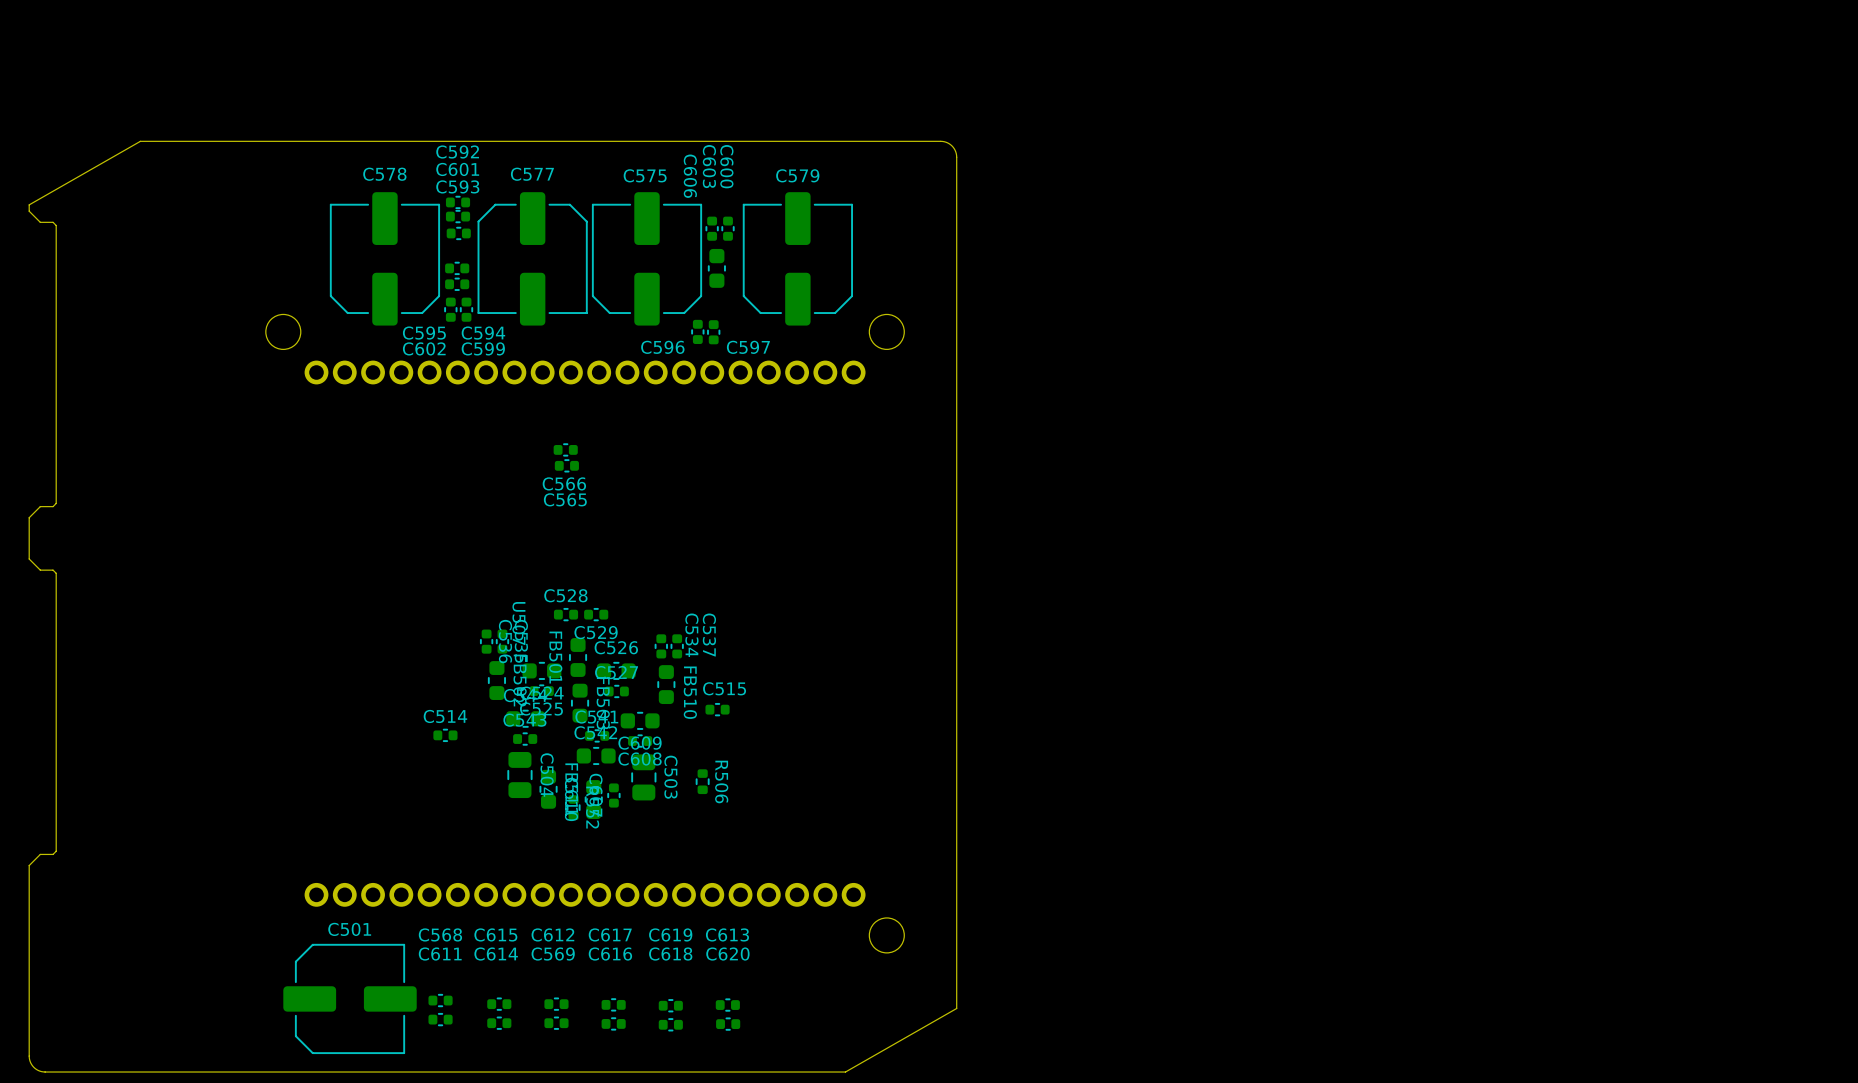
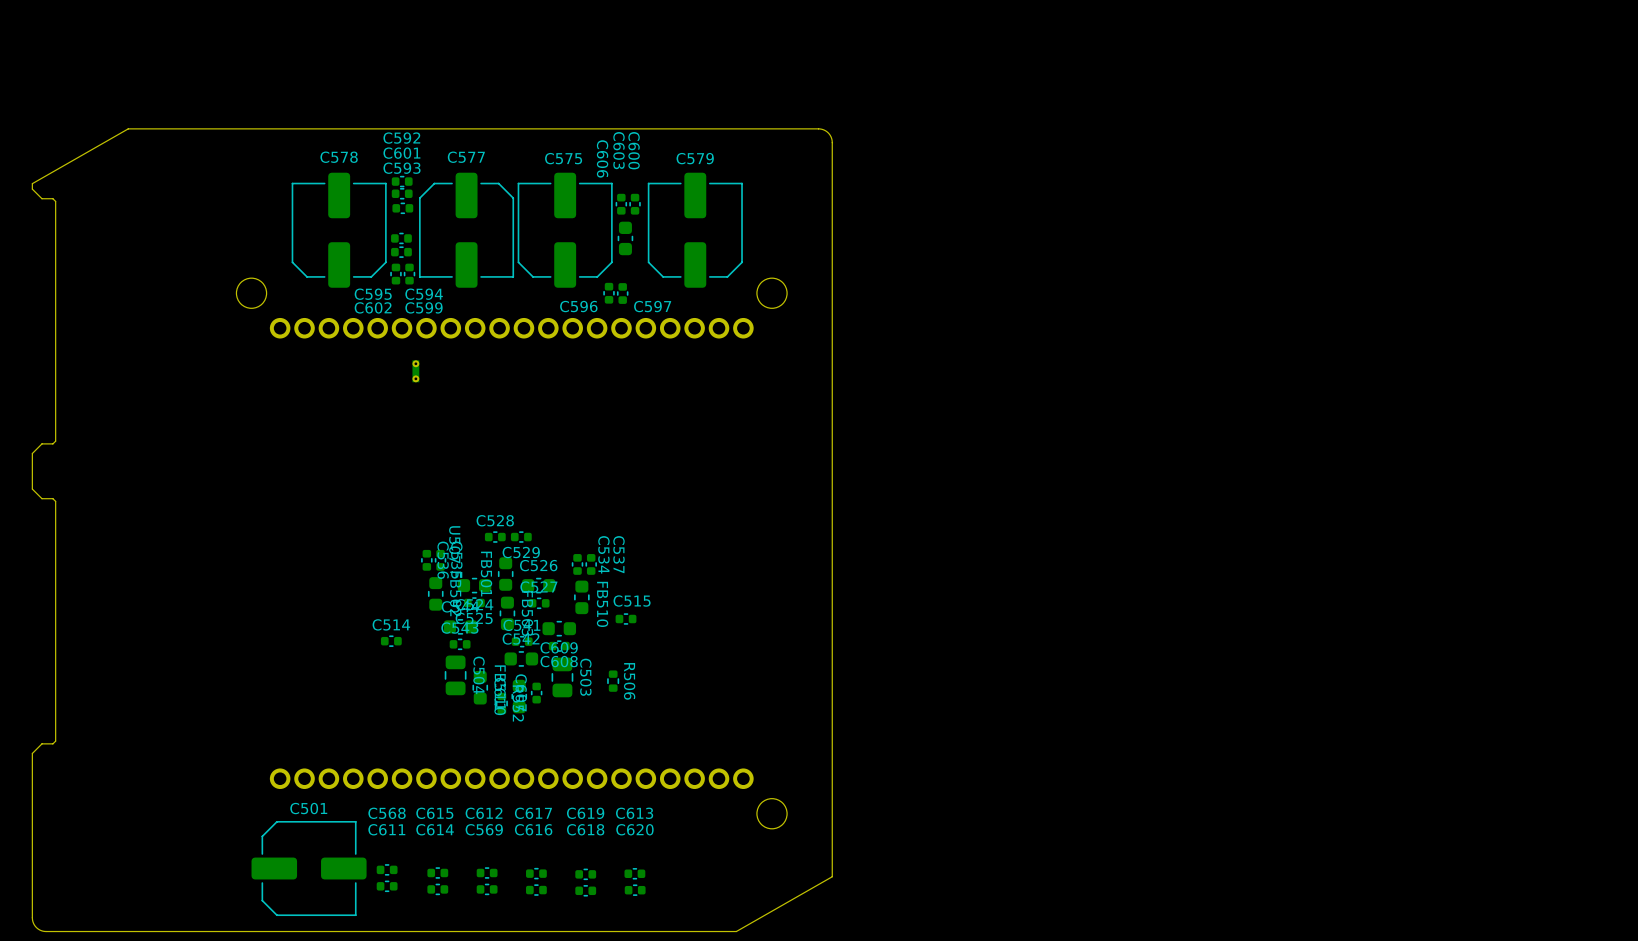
part: none -> (415, 371)
C566: (565, 449) -> none
C565: (566, 465) -> none

